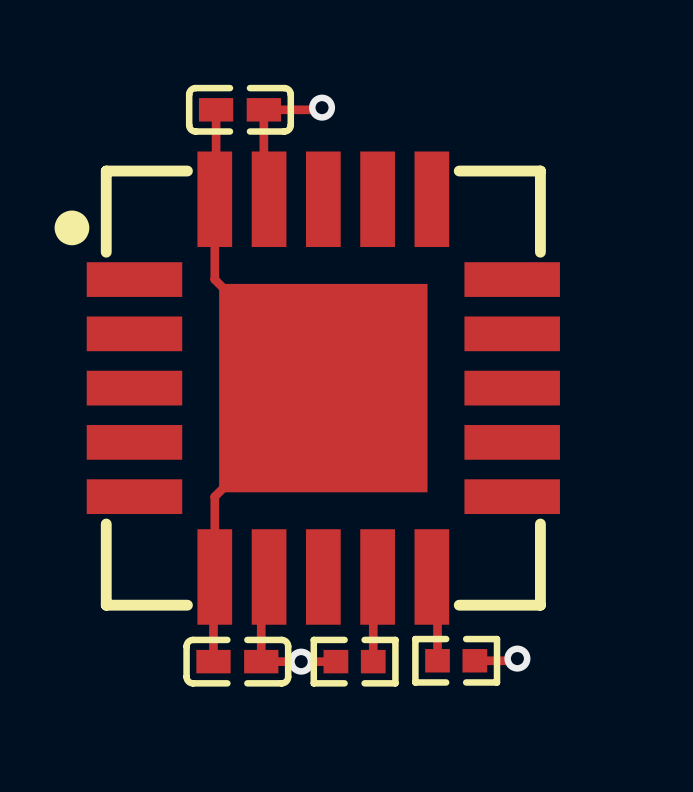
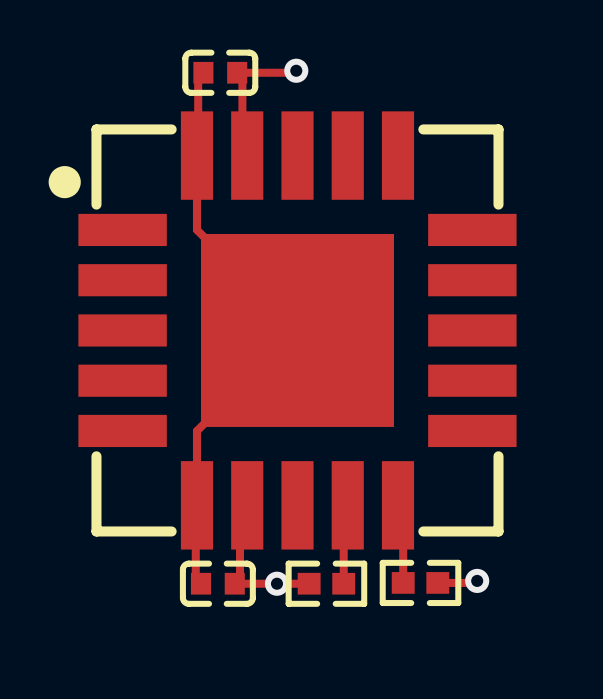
part footprint: [185, 84, 295, 135] -> [182, 49, 259, 96]
part footprint: [183, 636, 292, 687] -> [179, 560, 256, 607]

